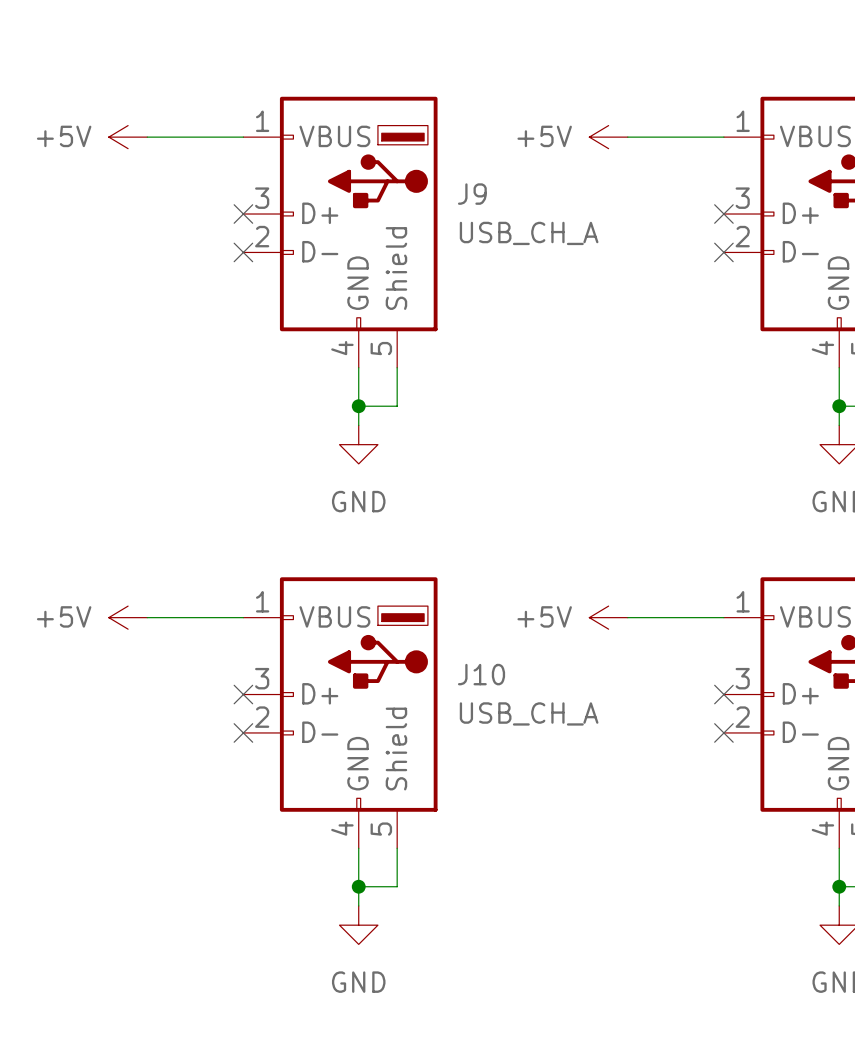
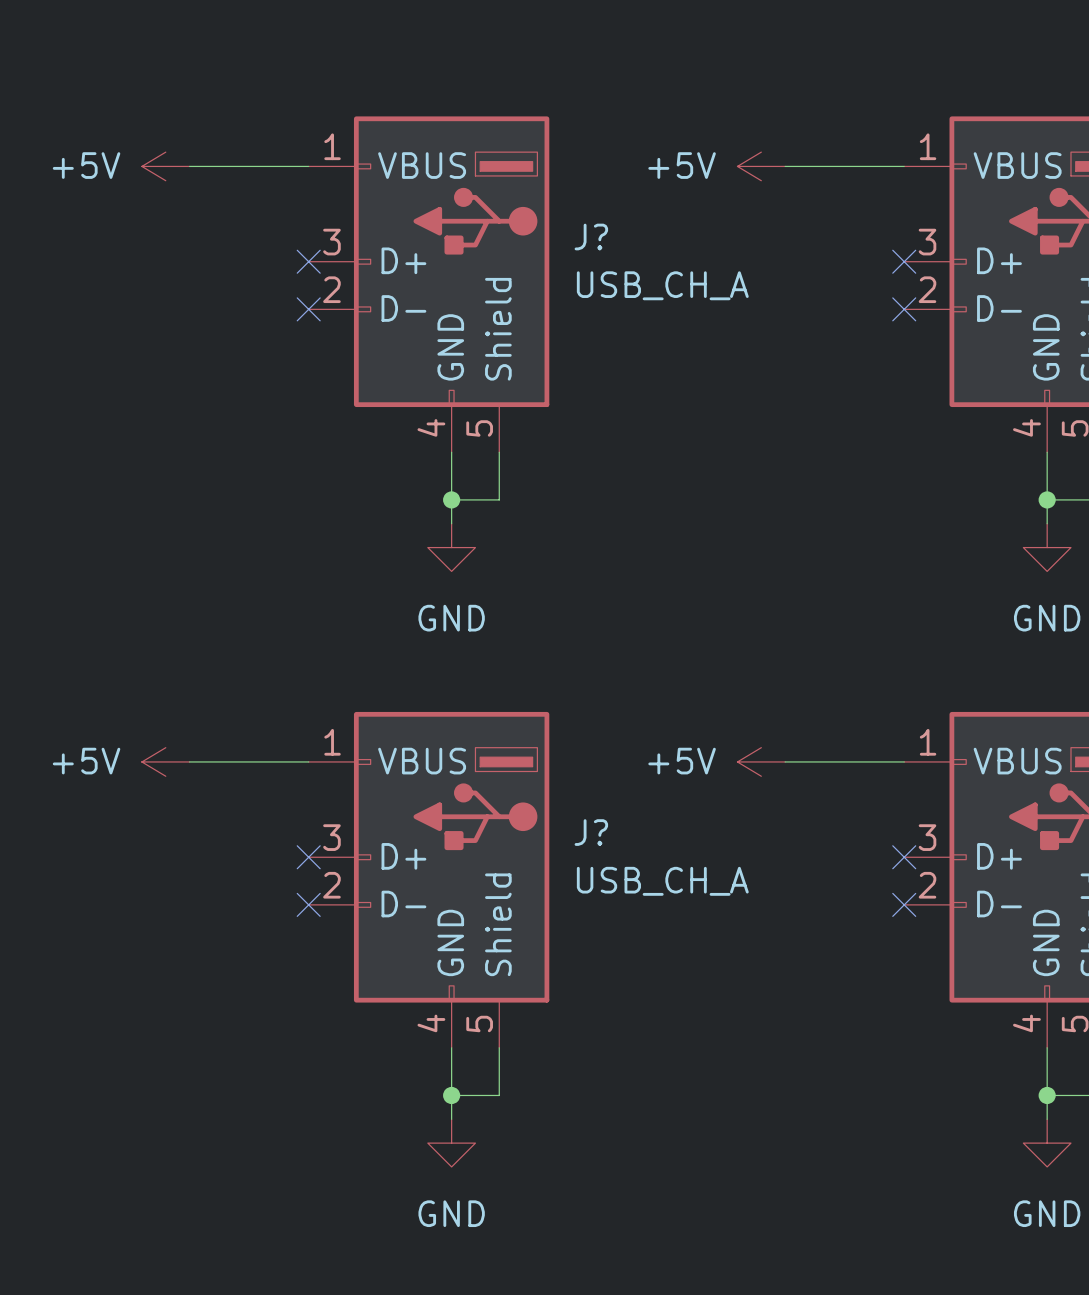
J9 name: J9 (472, 194) -> J? (591, 237)
J10 name: J10 (481, 674) -> J? (591, 832)

